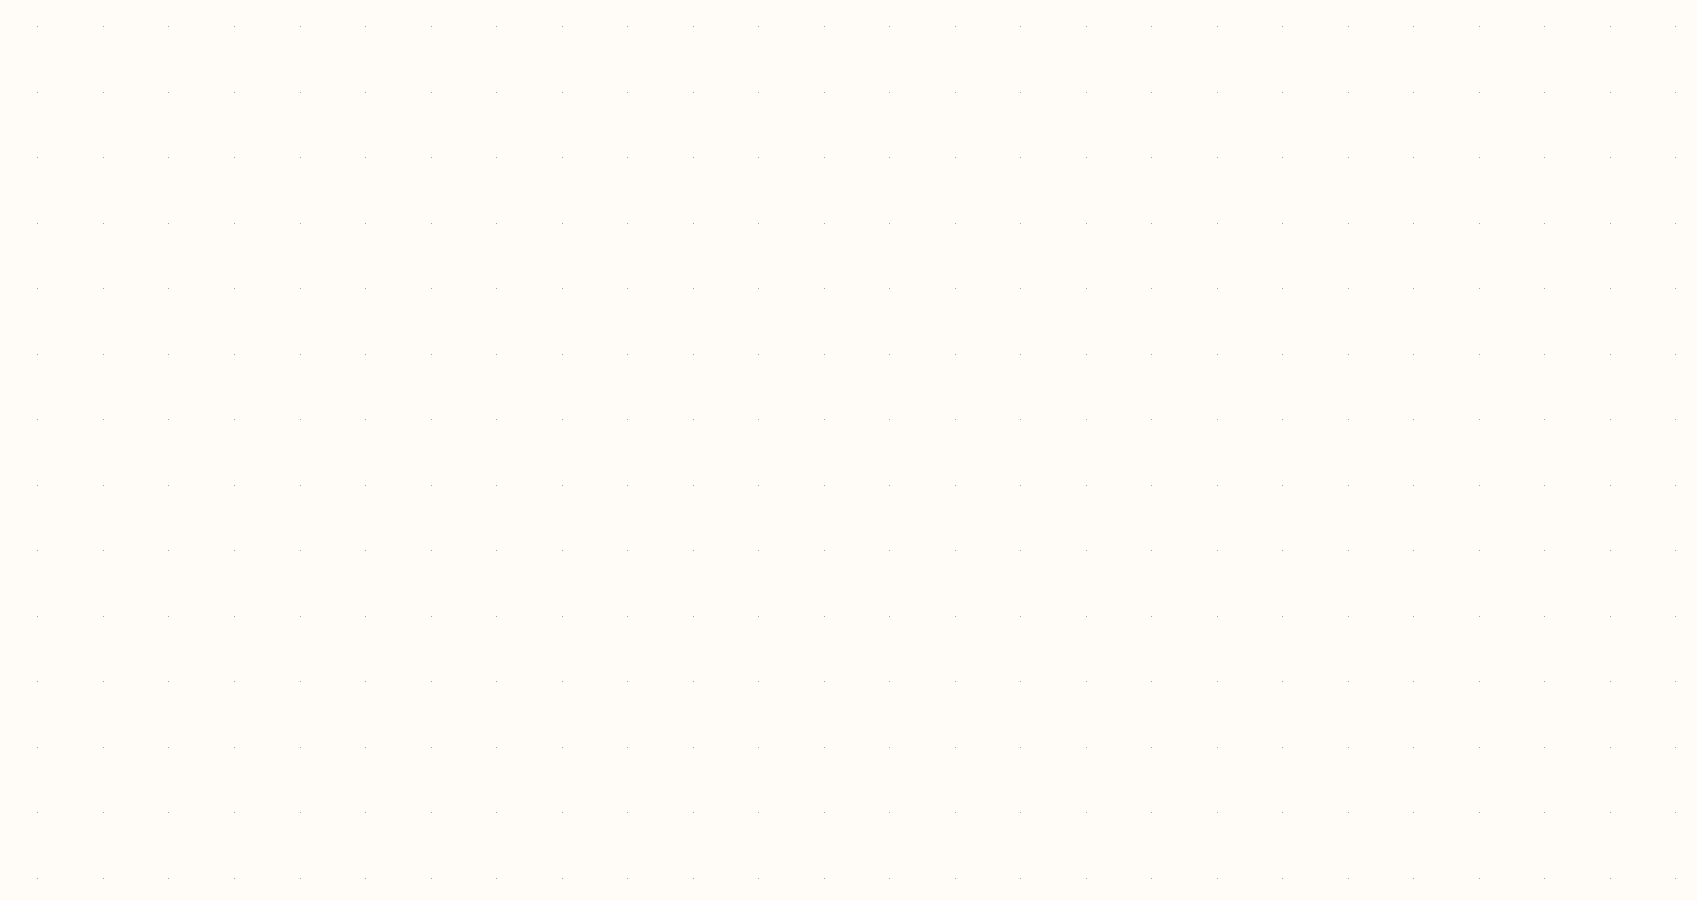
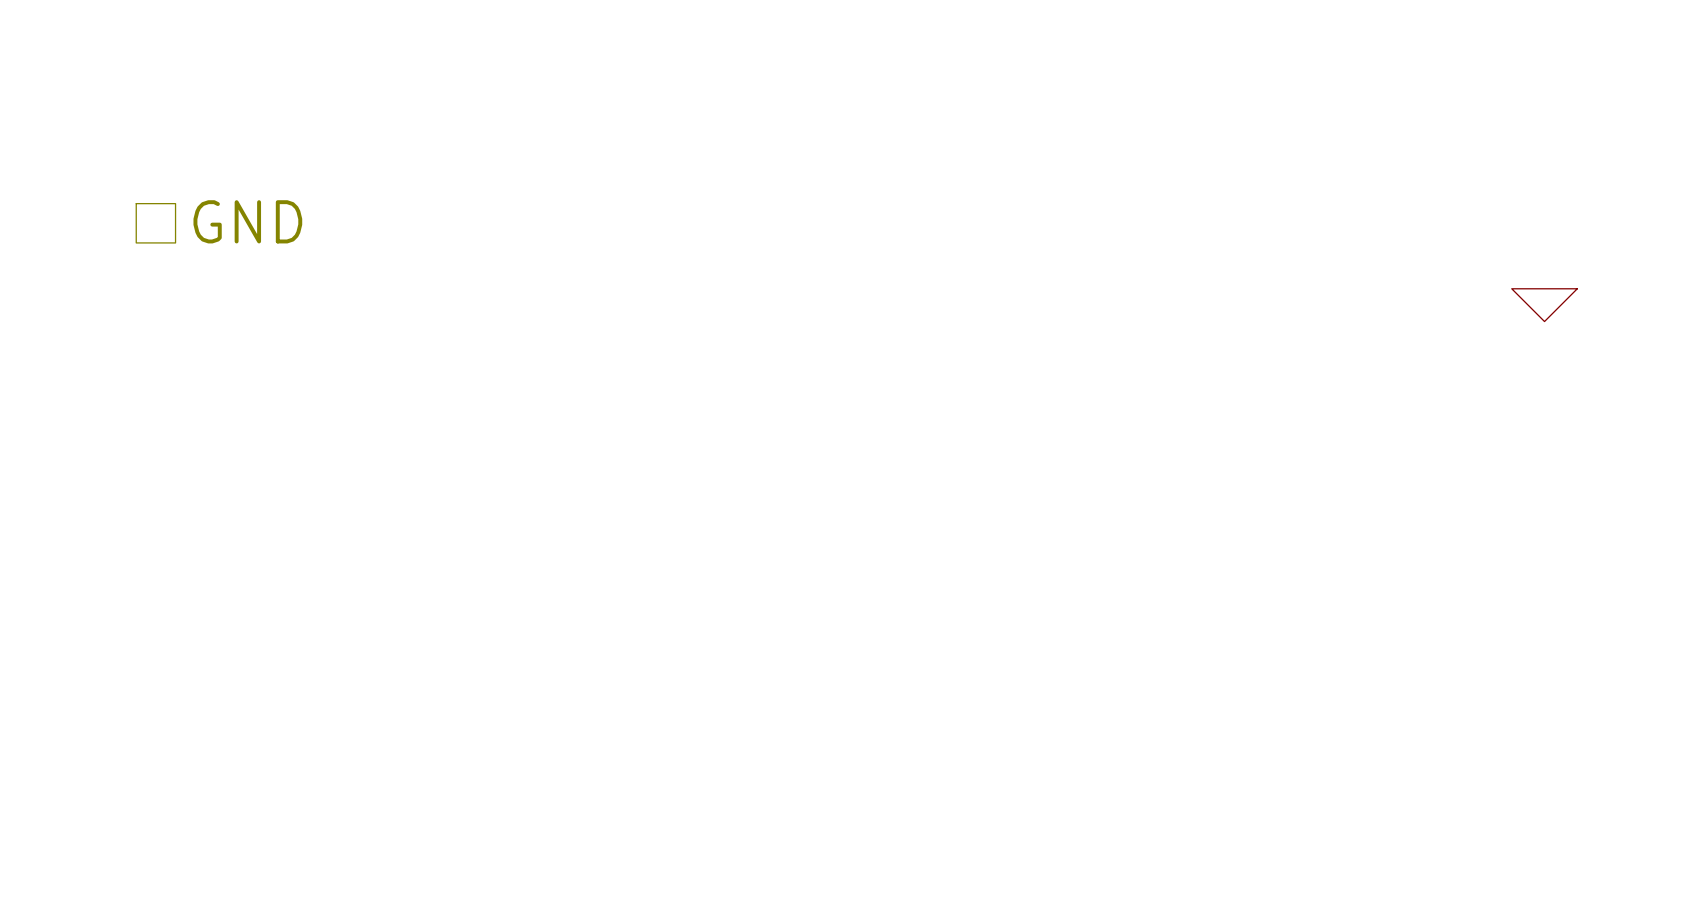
hierarchical label: none -> GND (247, 221)
power symbol: none -> (1544, 305)

